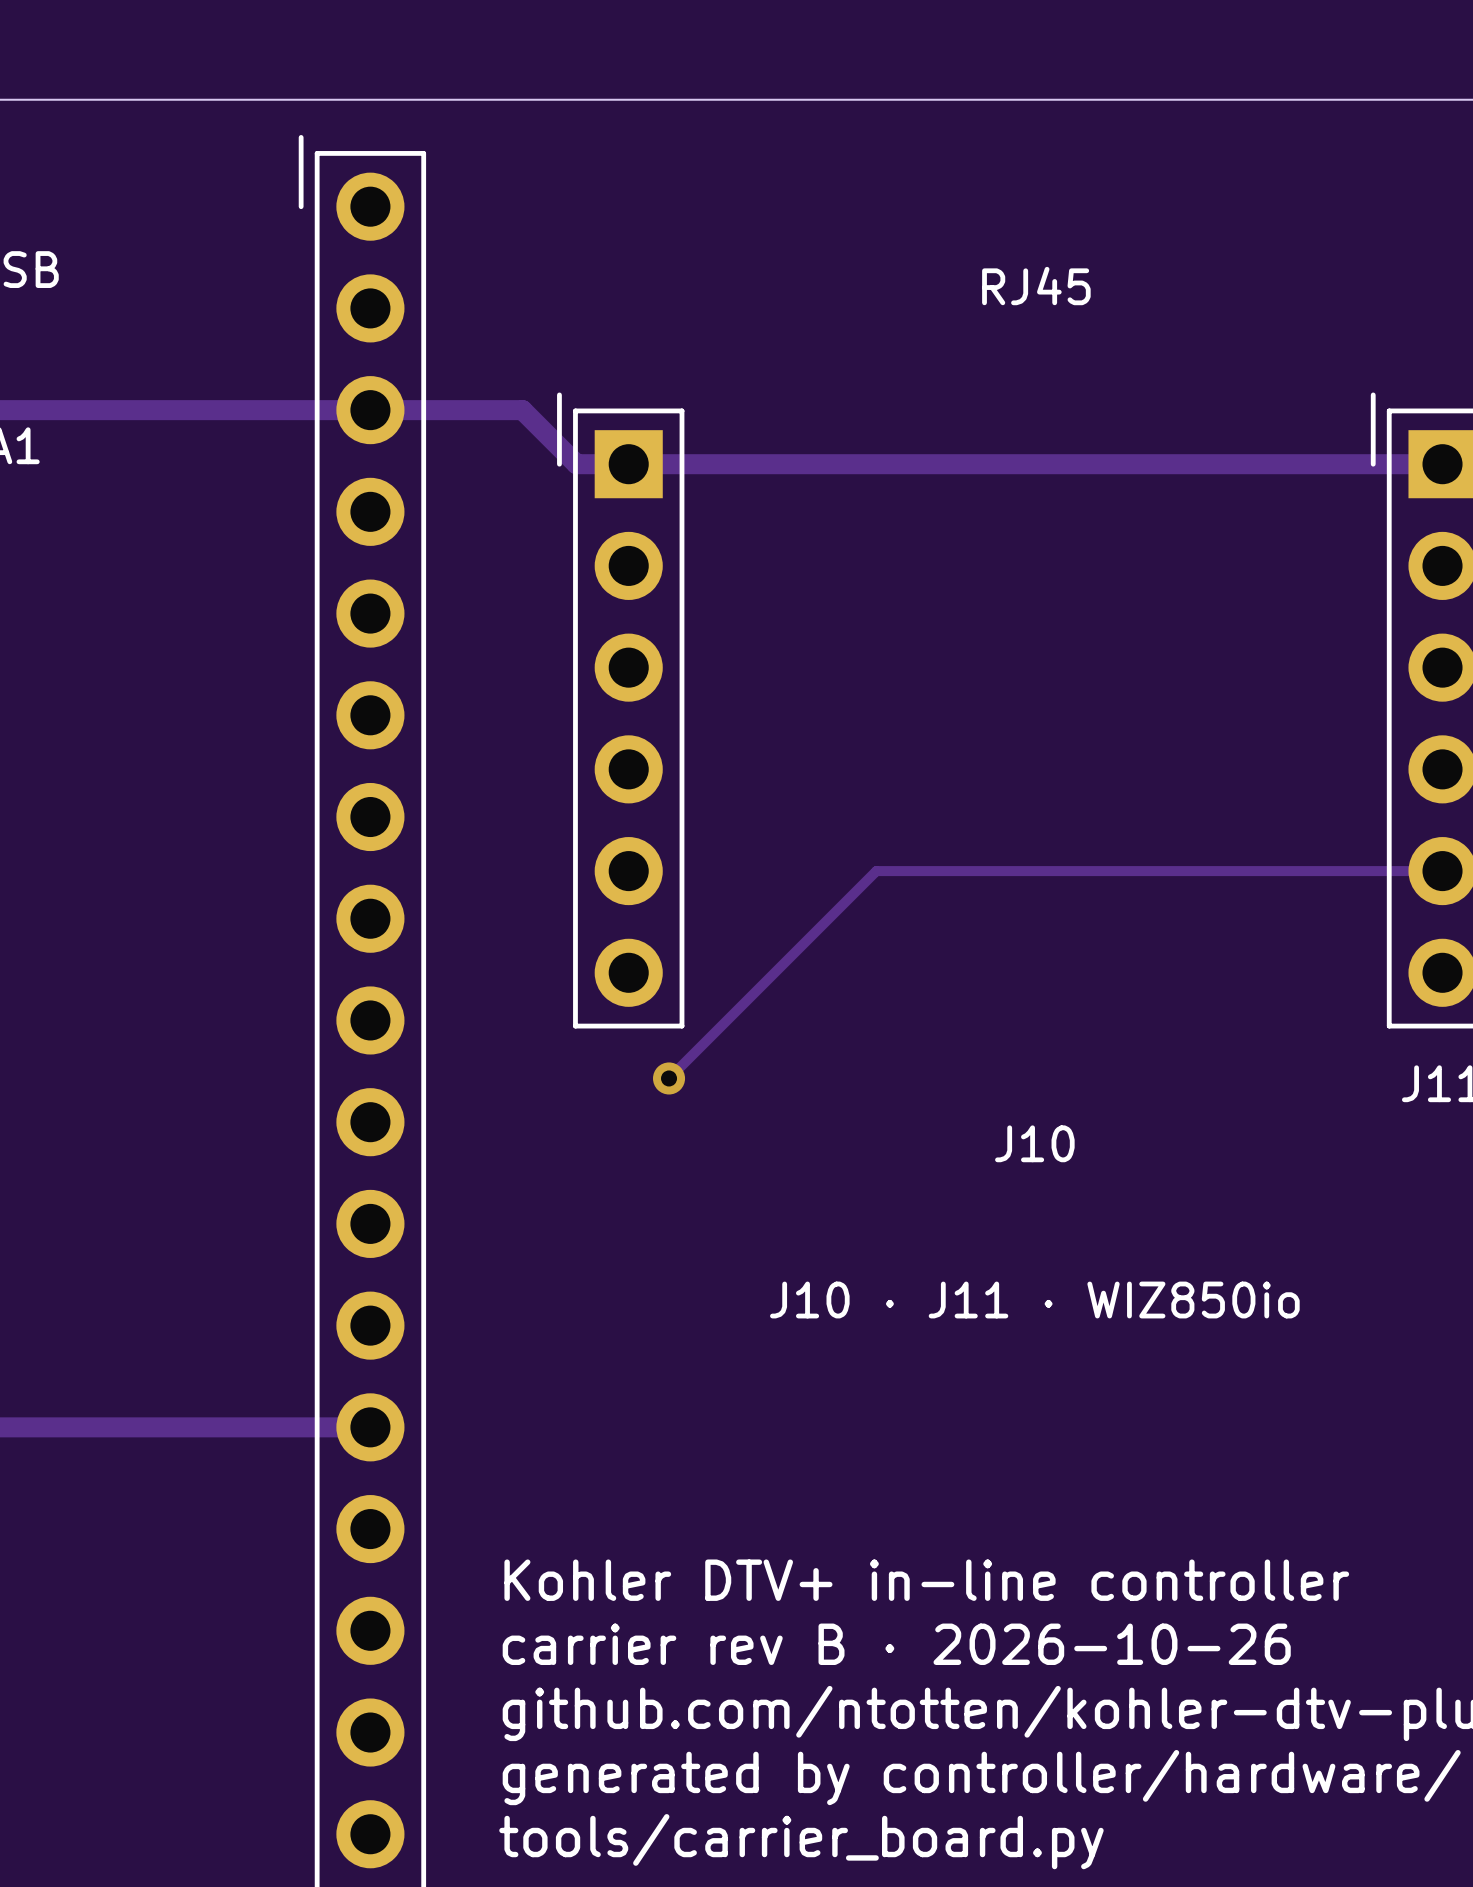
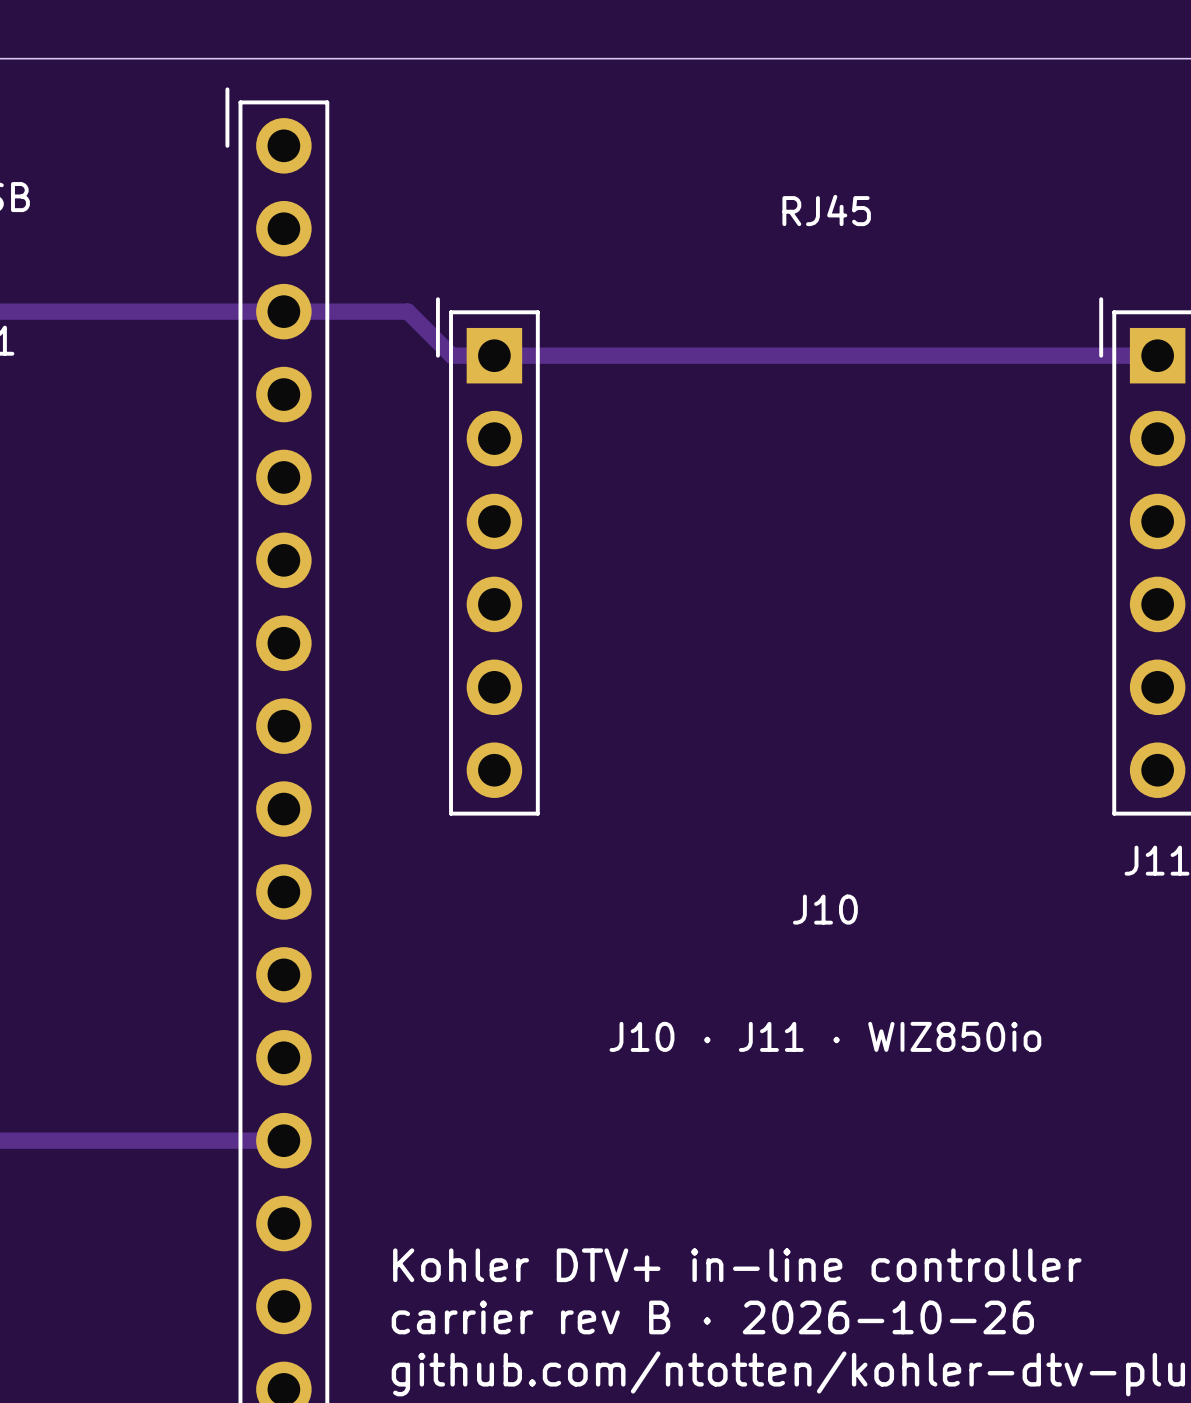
track: (1442, 871) (876, 871) (669, 1078) -> none
via: (669, 1078) -> none

